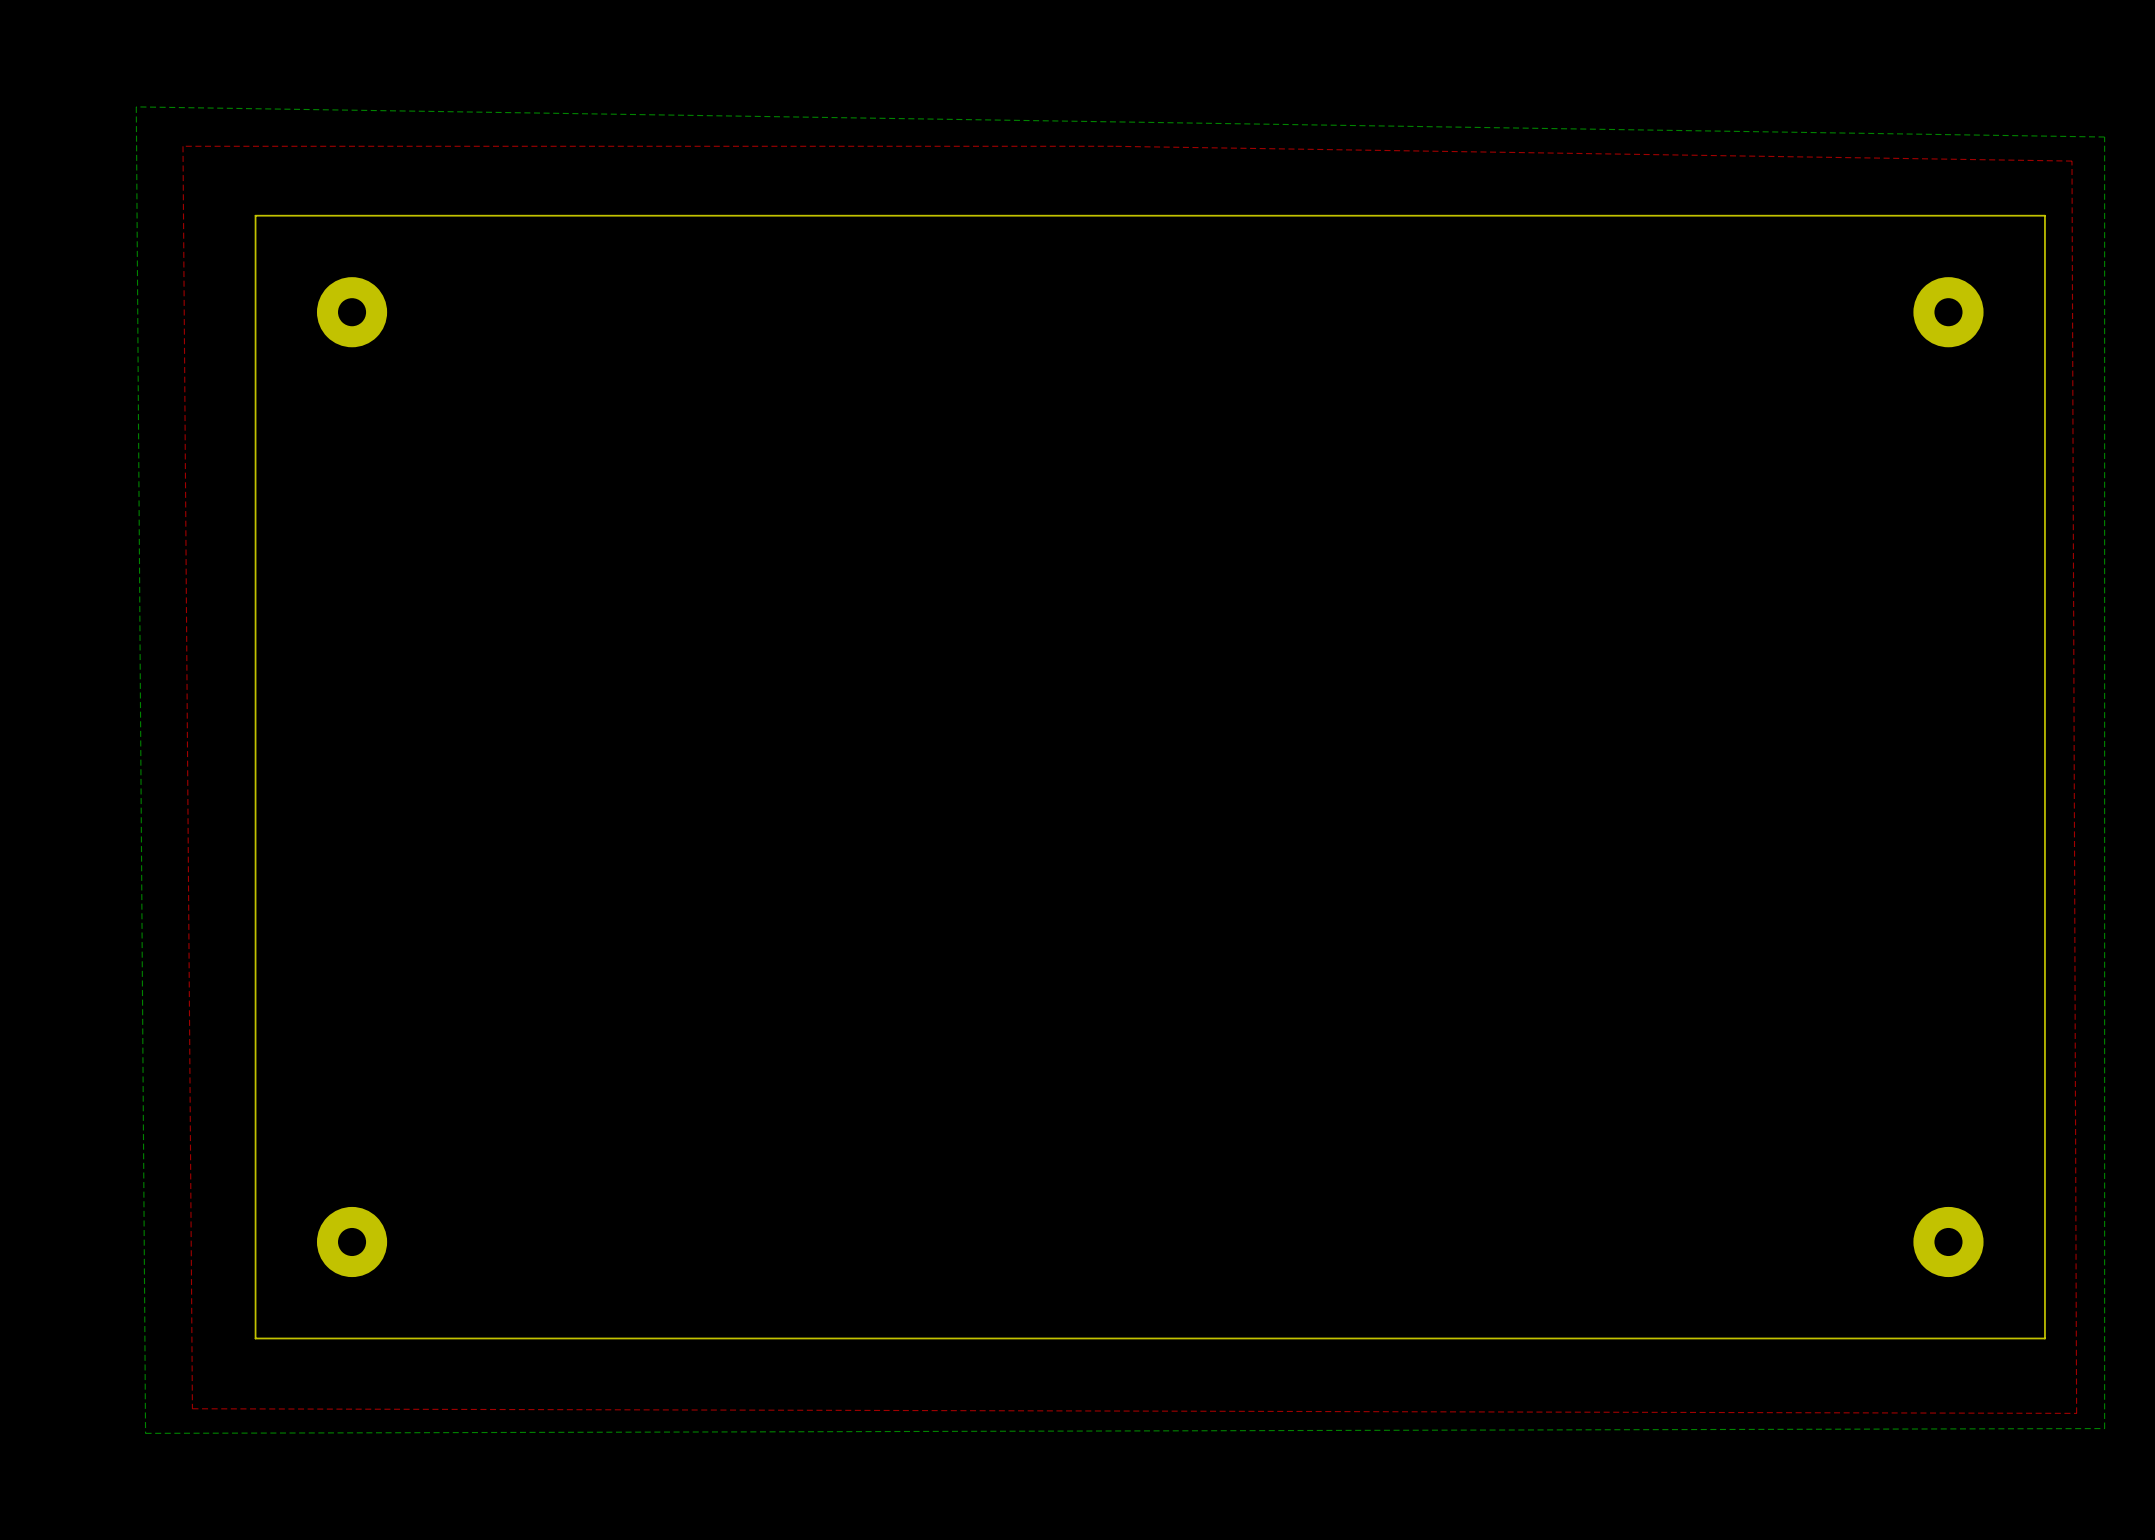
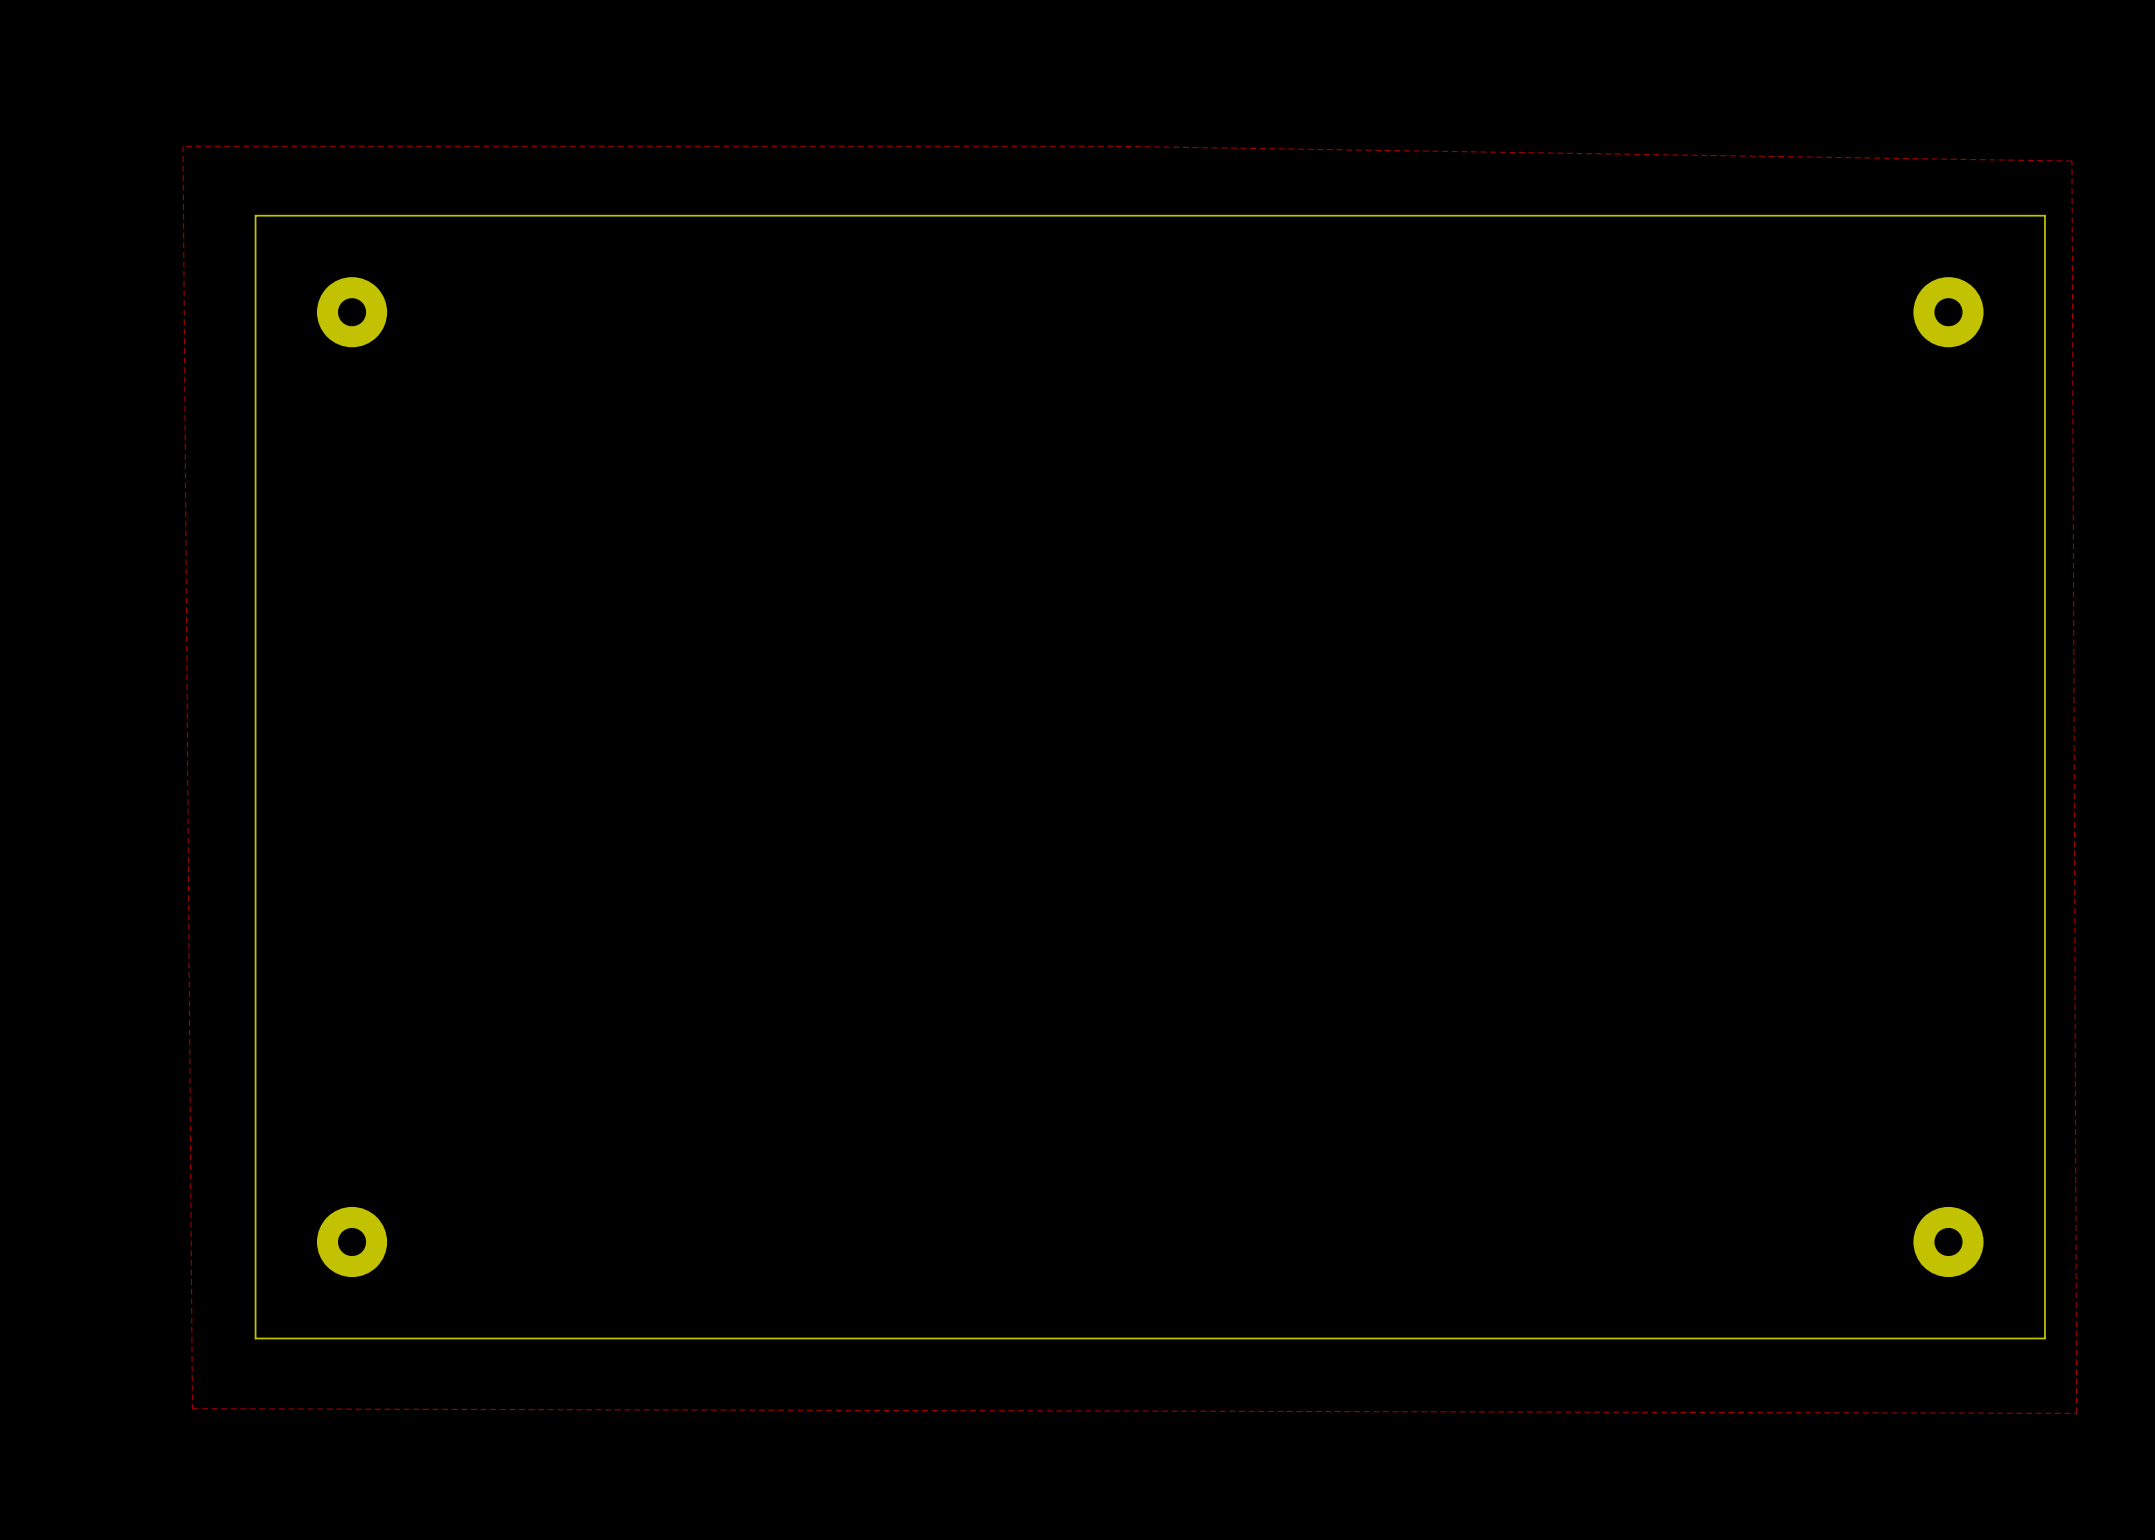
bottom zone outline: (136, 106) (2104, 137) (2104, 1428) (145, 1433) (136, 106) -> none

